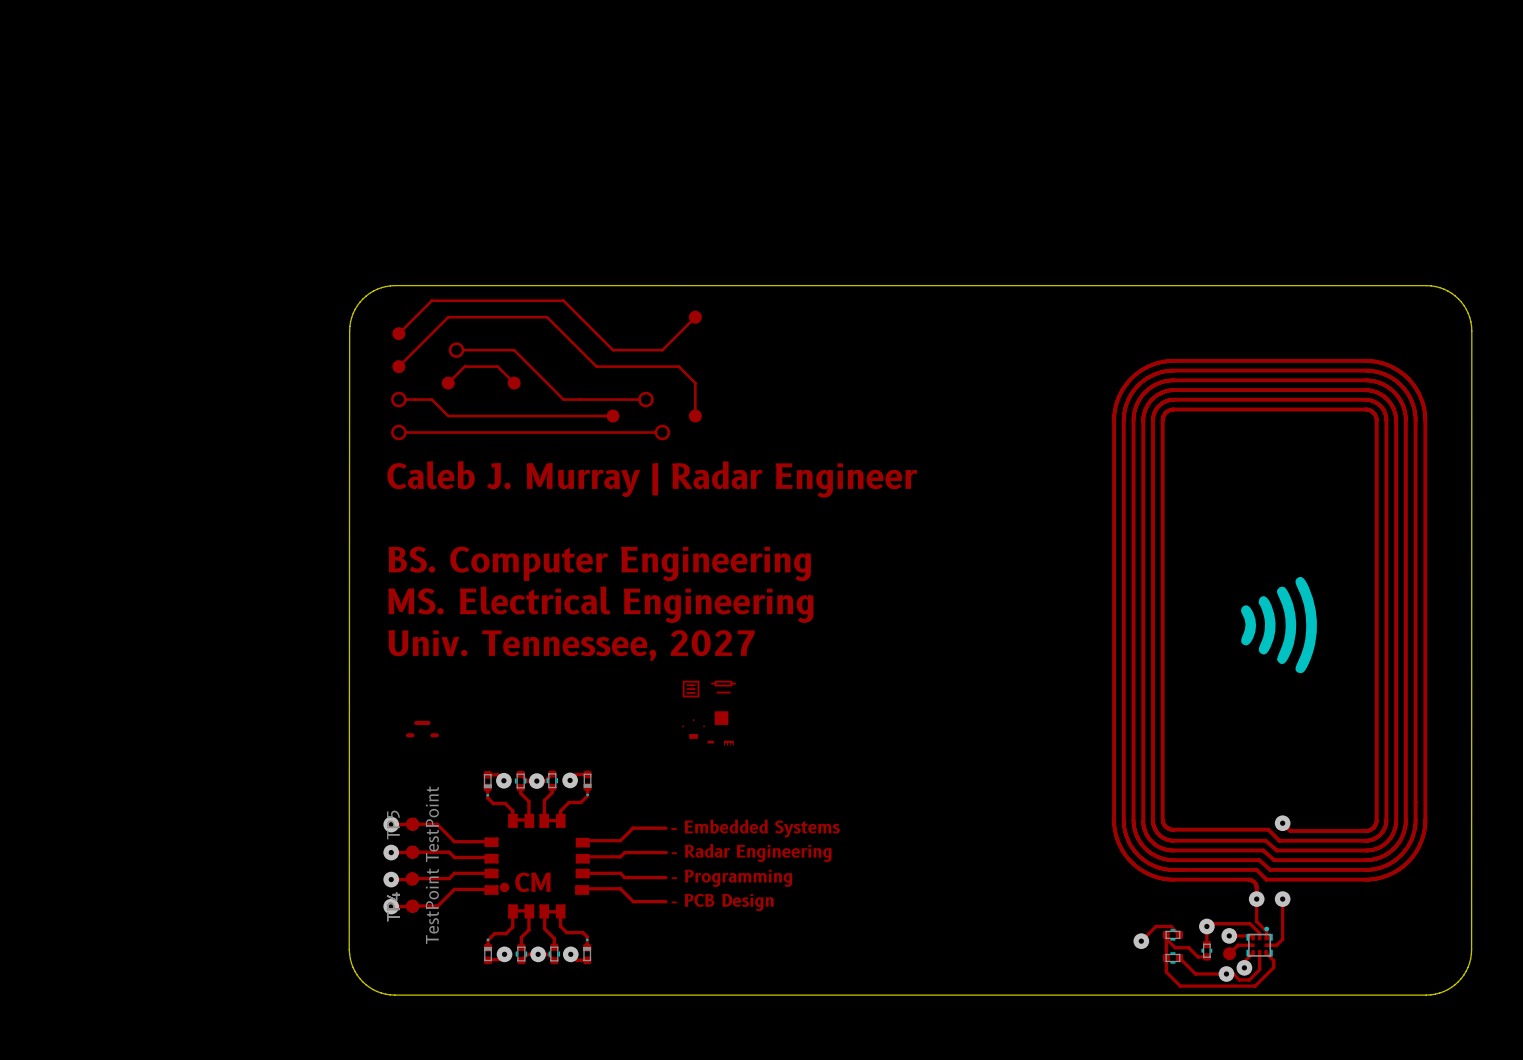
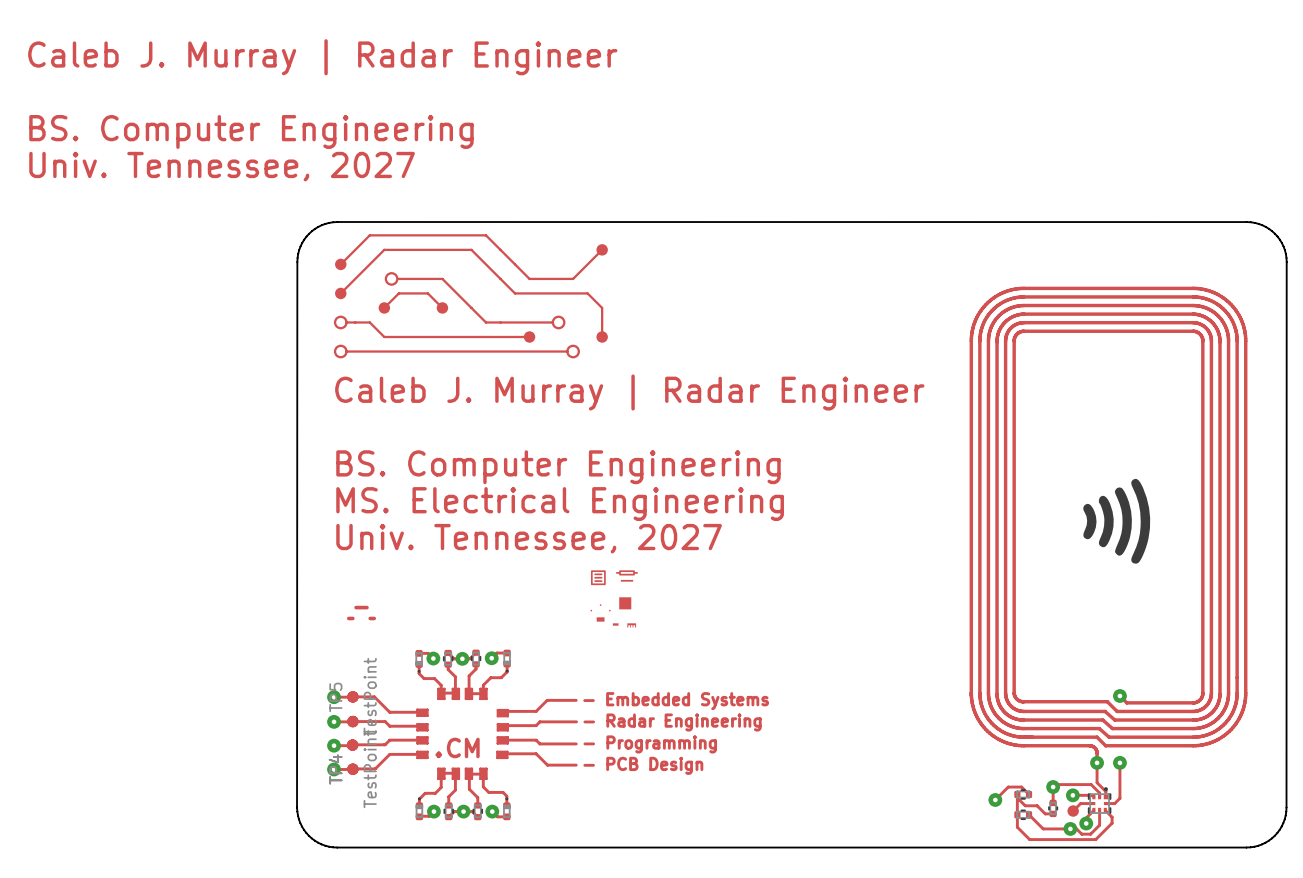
text: none -> Caleb J. Murray | Radar Engineer (322, 57)
text: none -> BS. Computer Engineering (251, 131)
text: none -> Univ. Tennessee, 2027 (222, 166)

